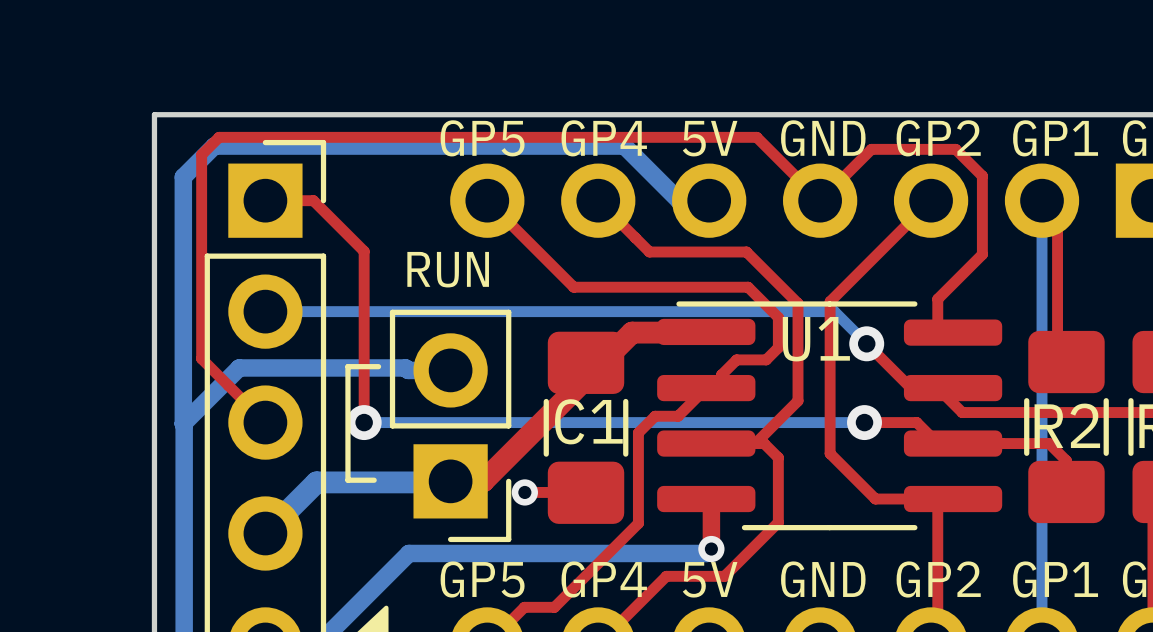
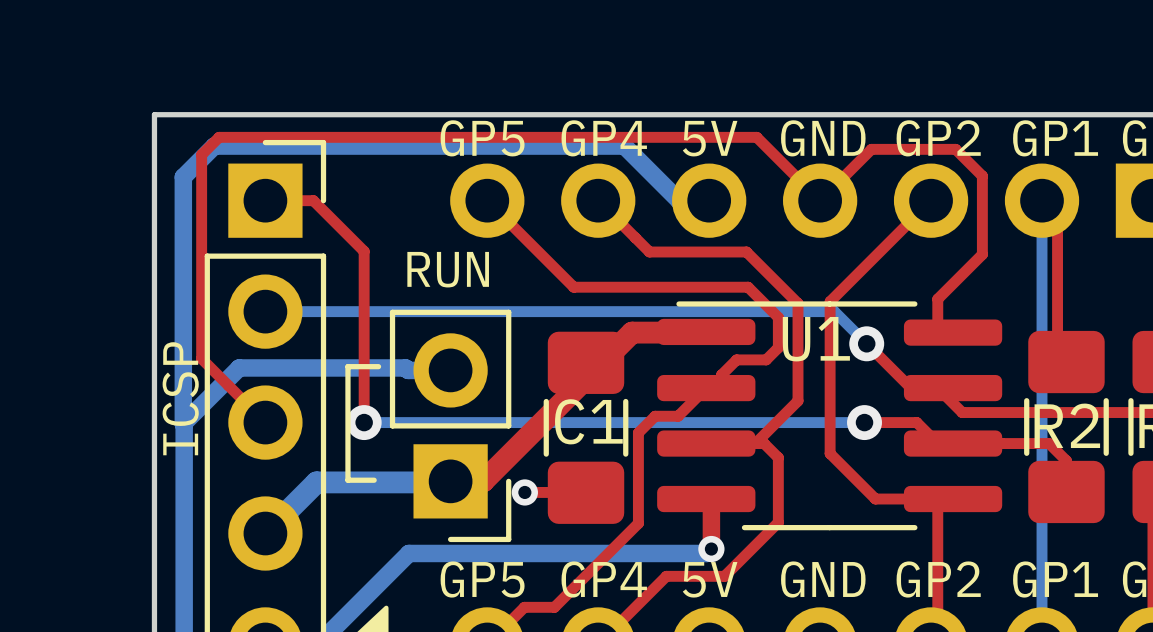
text: none -> ICSP (180, 398)

